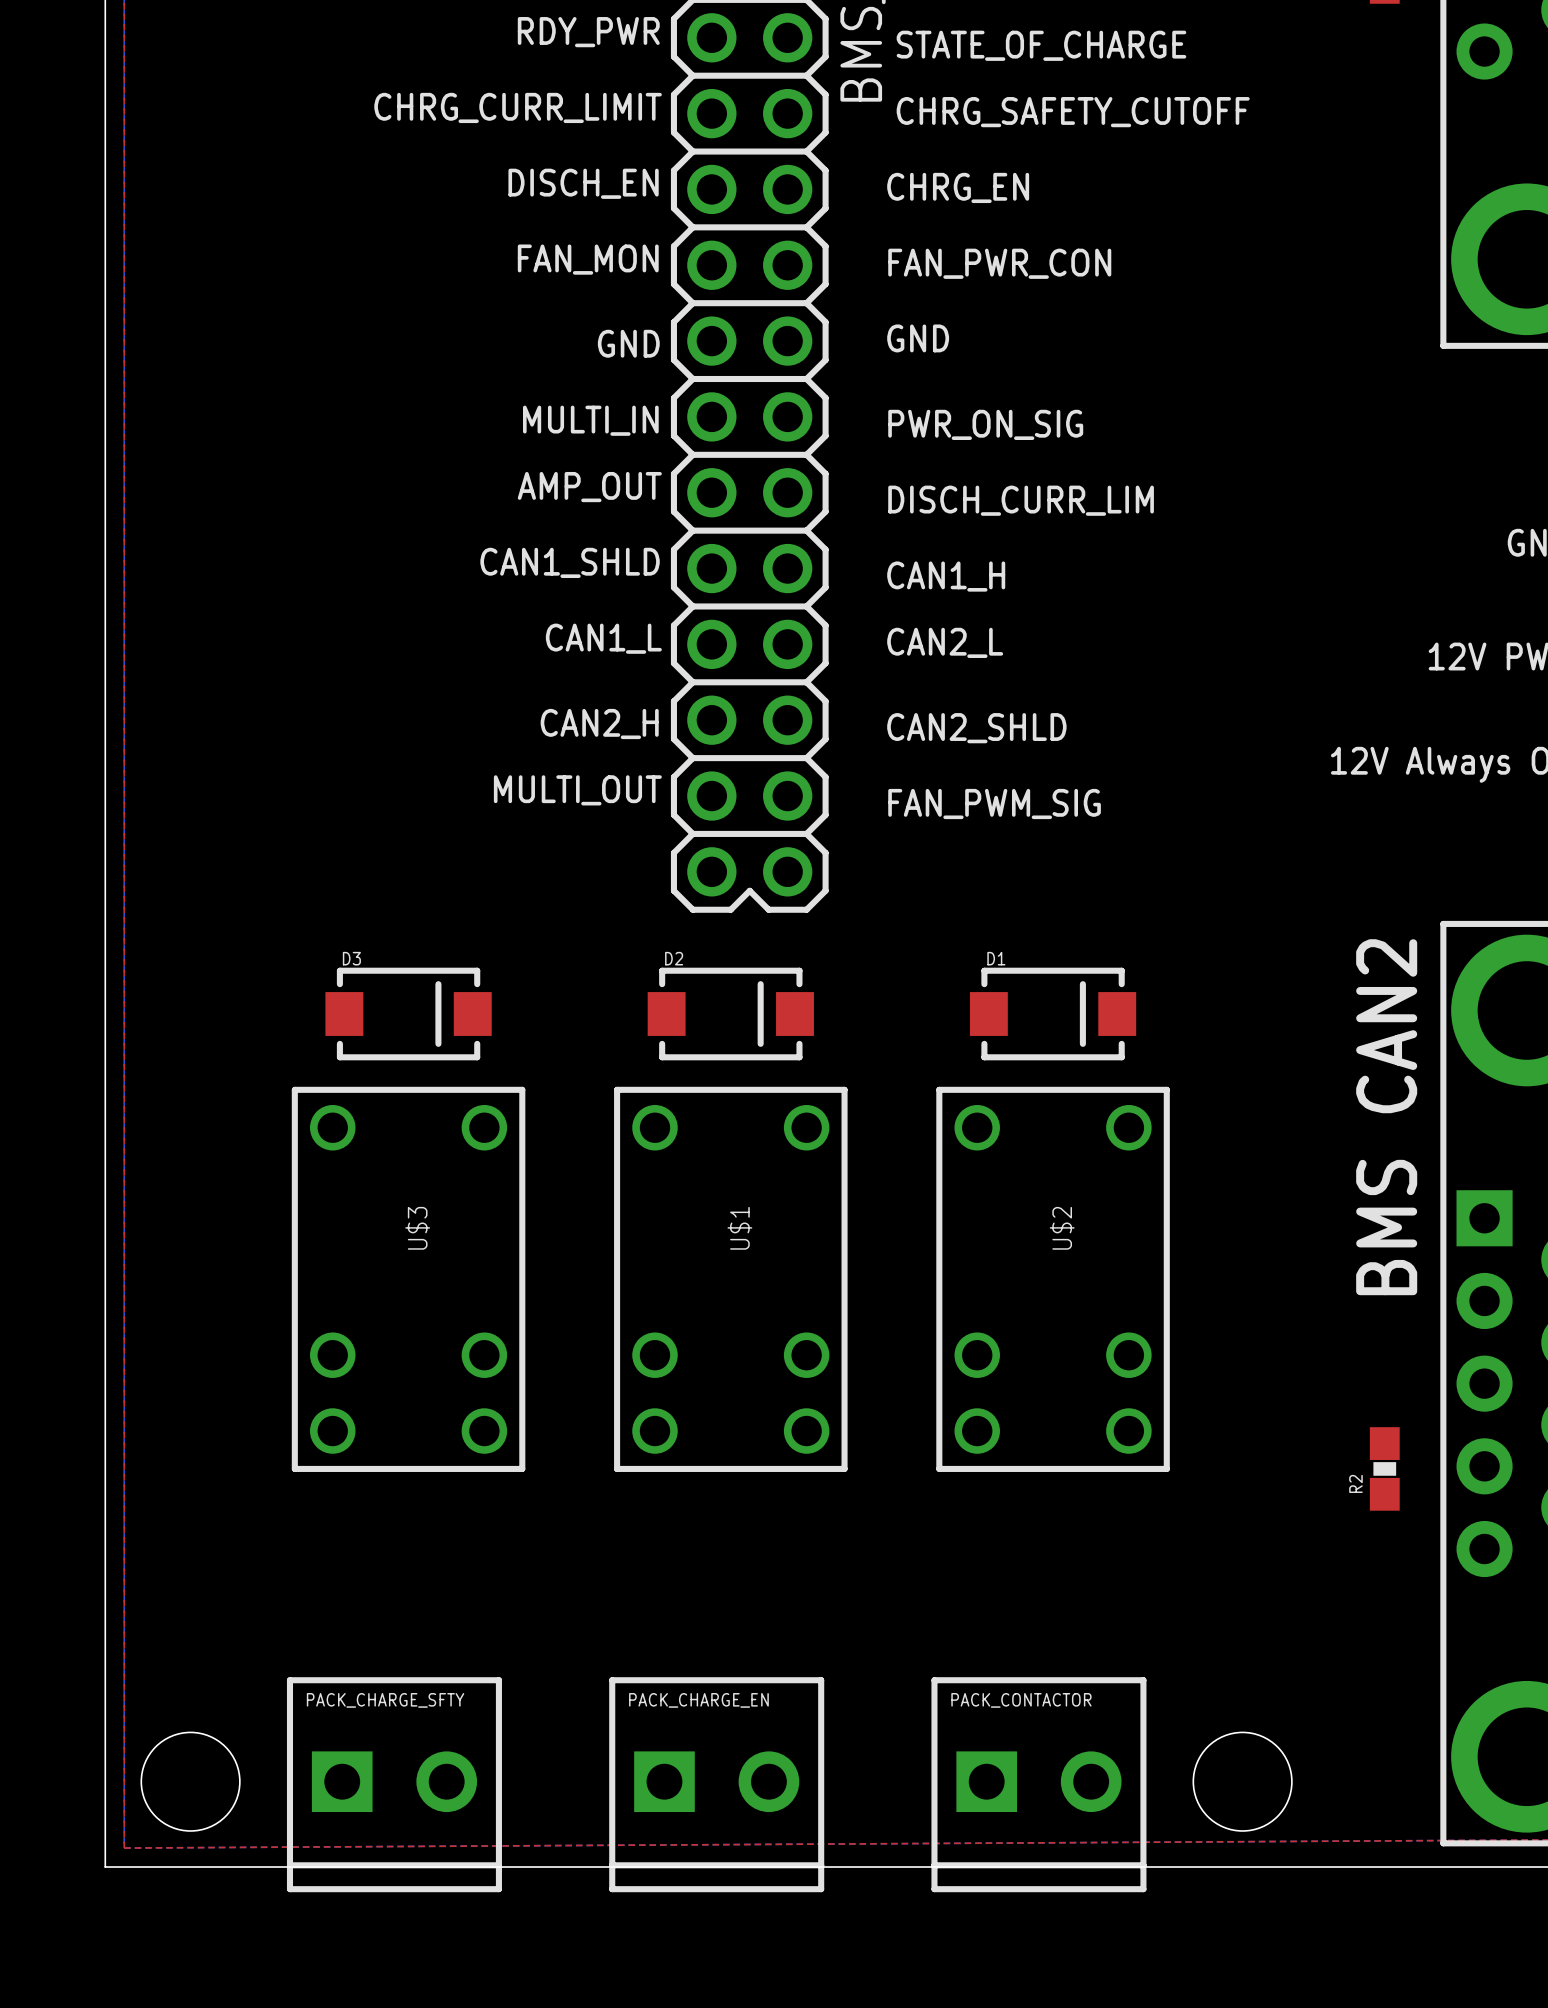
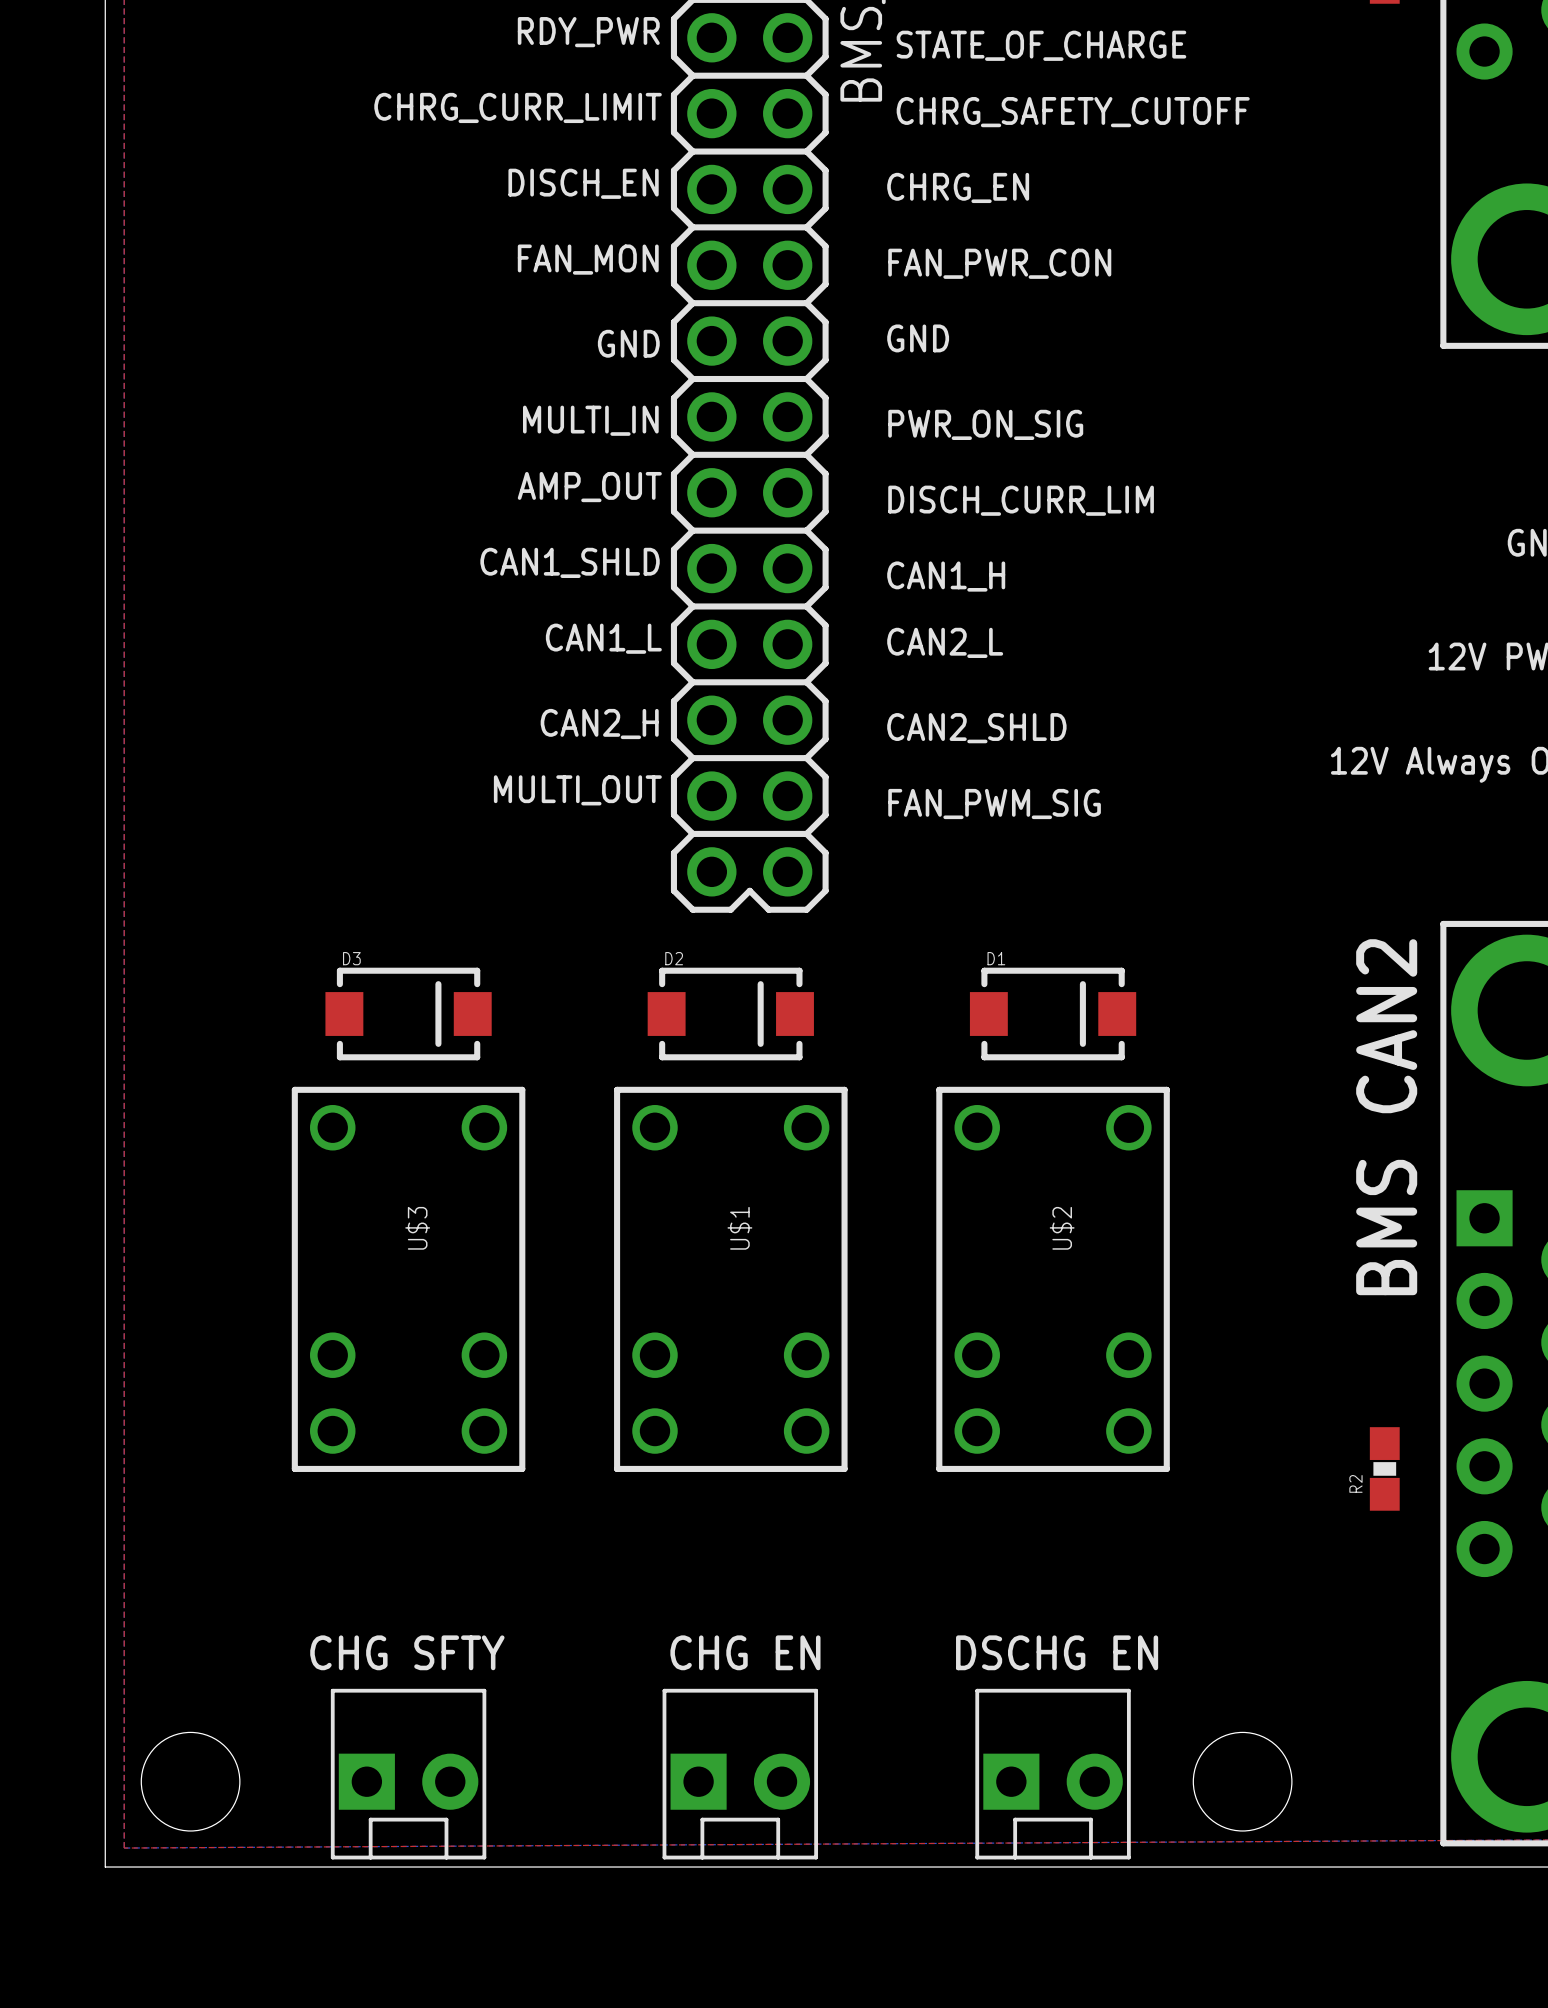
text: none -> CHG SFTY (407, 1652)
text: none -> CHG EN (745, 1652)
text: none -> DSCHG EN (1057, 1652)
part: none -> (408, 1774)
part: none -> (740, 1774)
part: none -> (1053, 1774)
PACK_CHARGE_SFTY: (394, 1784) -> none
PACK_CHARGE_EN: (716, 1784) -> none
PACK_CONTACTOR: (1038, 1784) -> none

